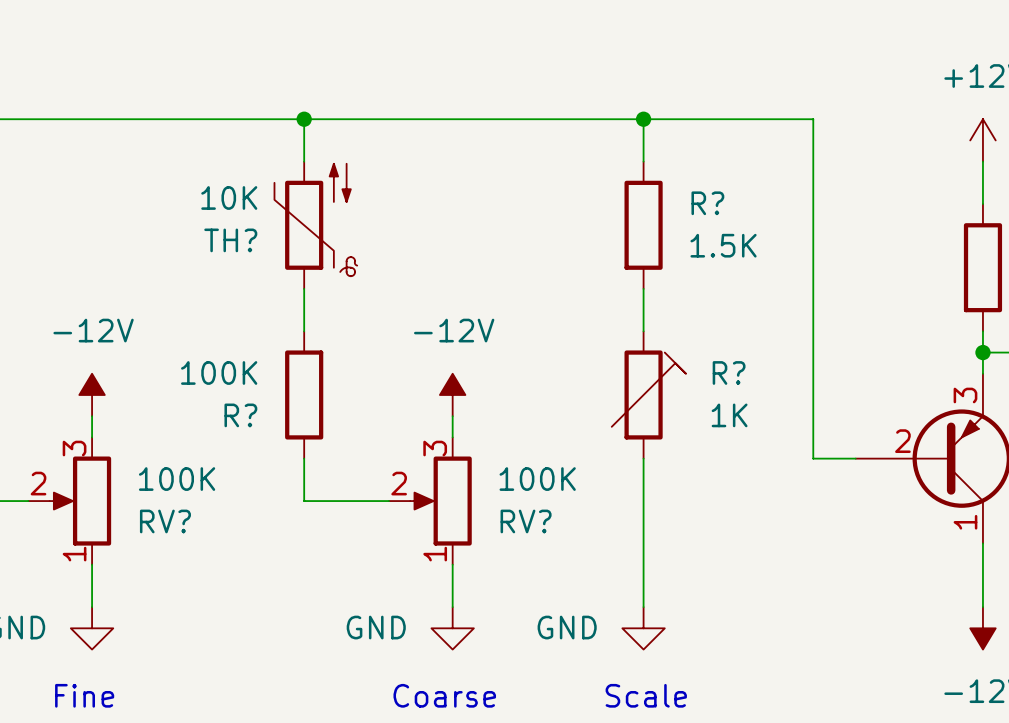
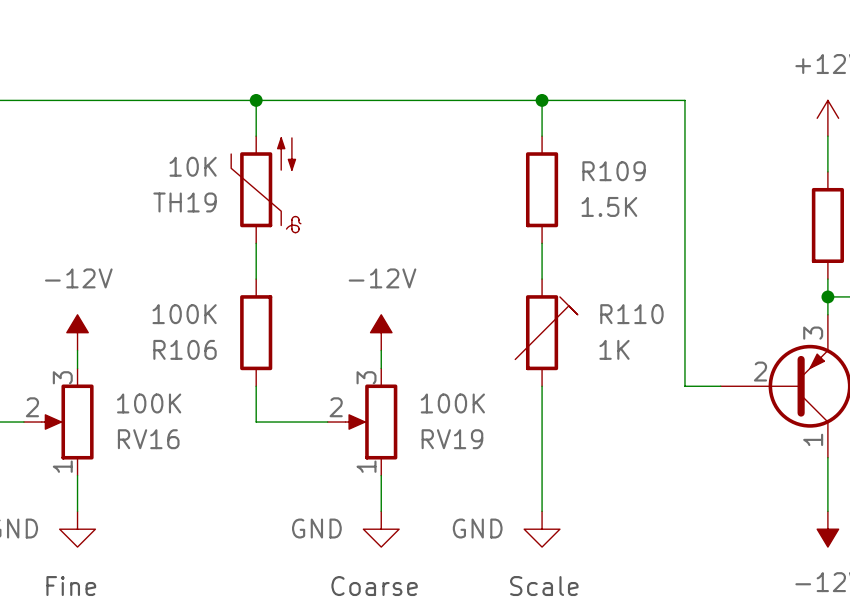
R? name: R? (707, 203) -> R109 (614, 171)
TH? name: TH? (230, 240) -> TH19 (185, 202)
R? name: R? (729, 372) -> R110 (631, 314)
R? name: R? (240, 415) -> R106 (185, 349)
RV? name: RV? (165, 521) -> RV16 (148, 439)
RV? name: RV? (526, 521) -> RV19 (452, 439)

